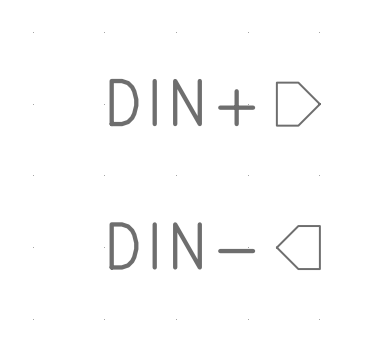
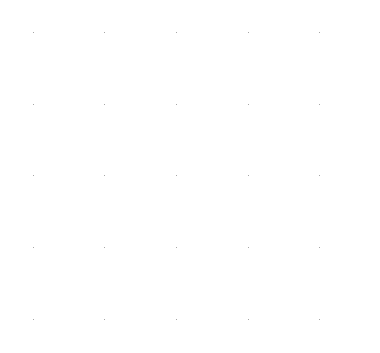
hierarchical label: DIN+ (182, 102) -> none
hierarchical label: DIN- (182, 245) -> none

